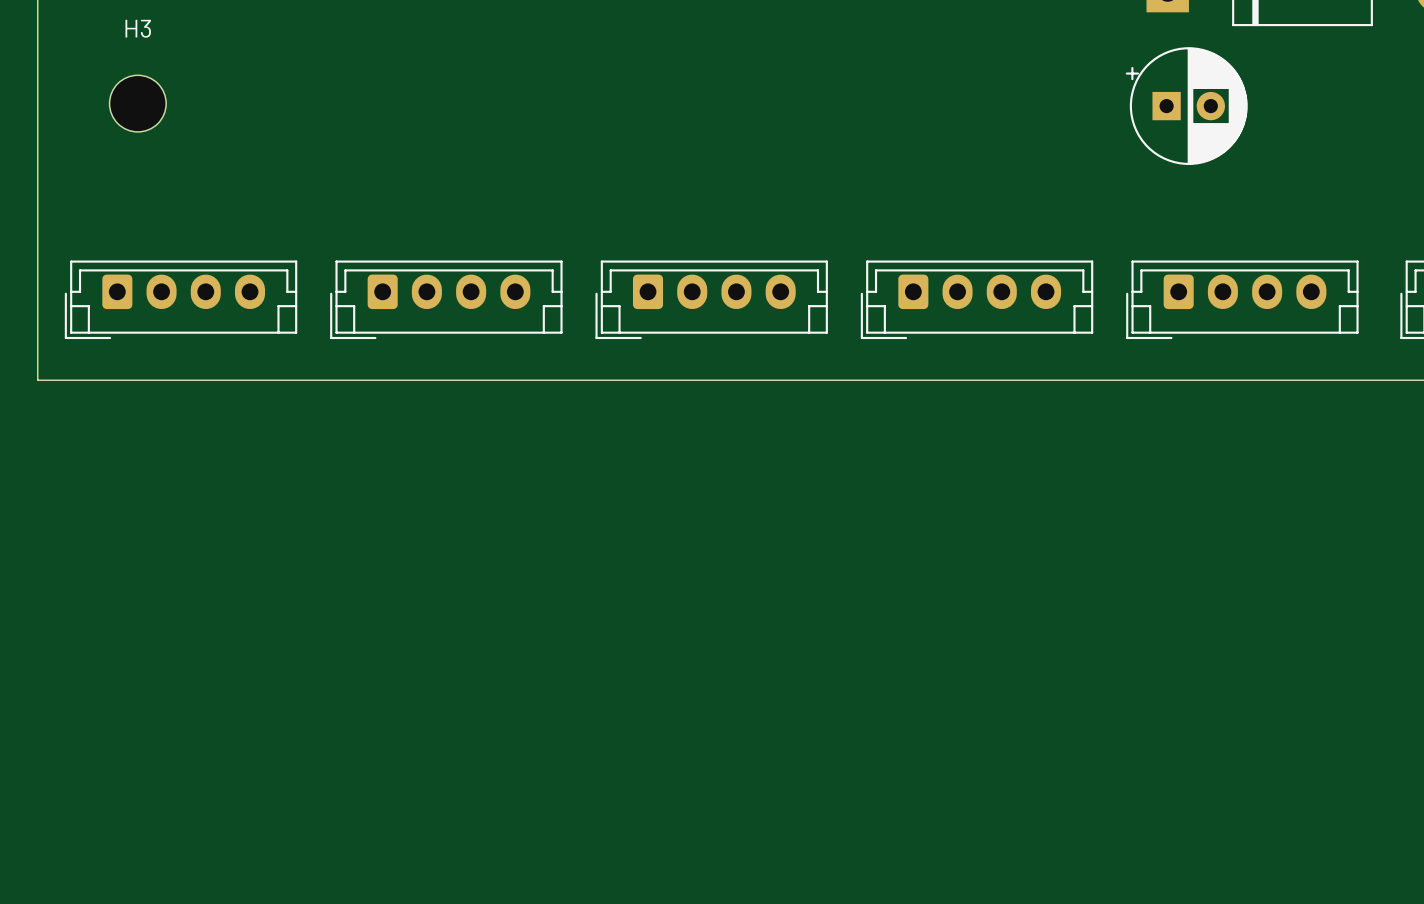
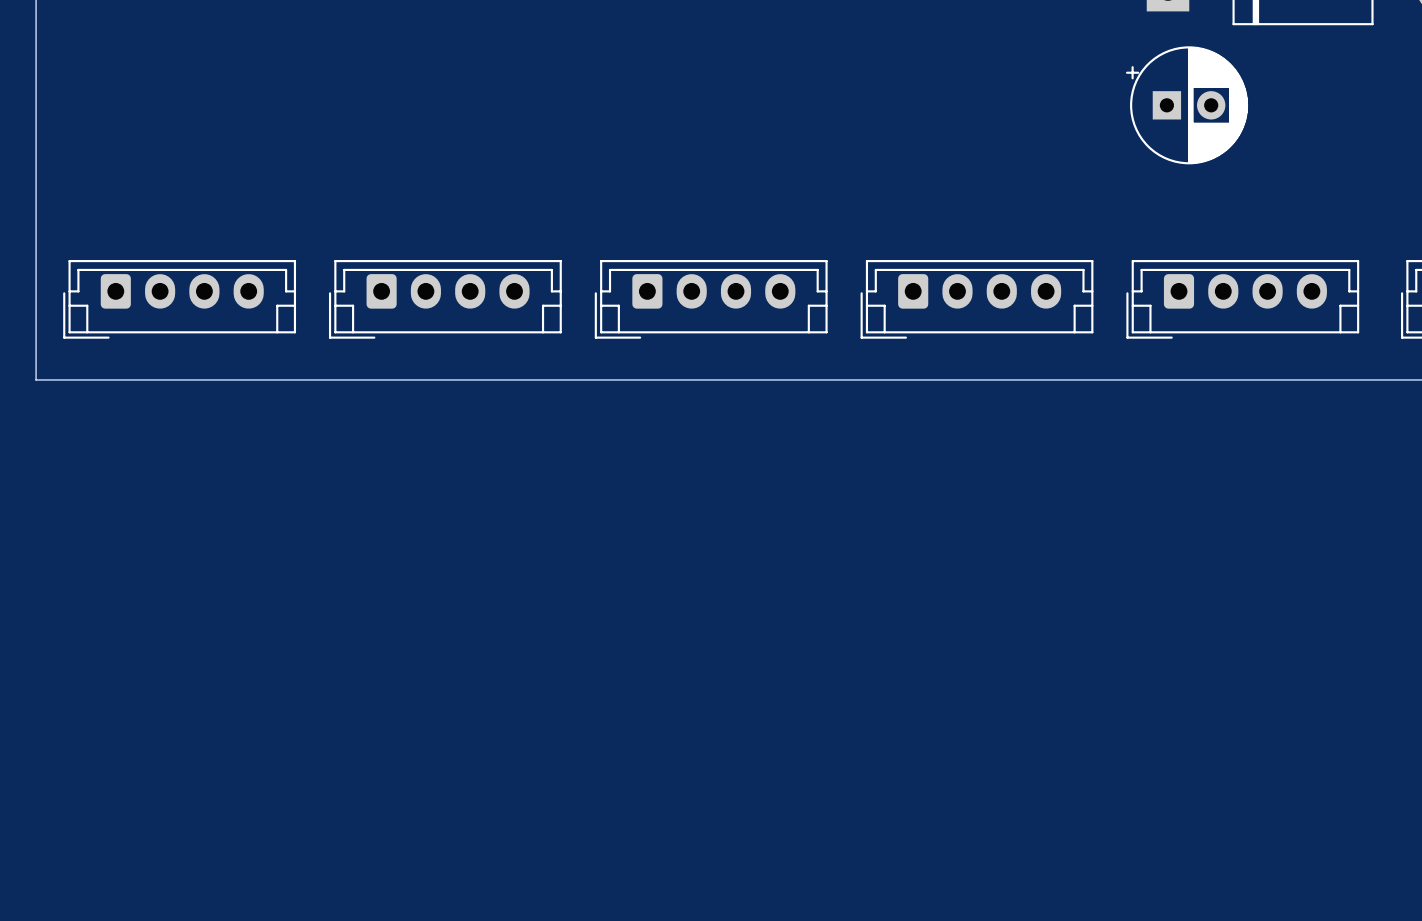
H3: (137, 103) -> none

